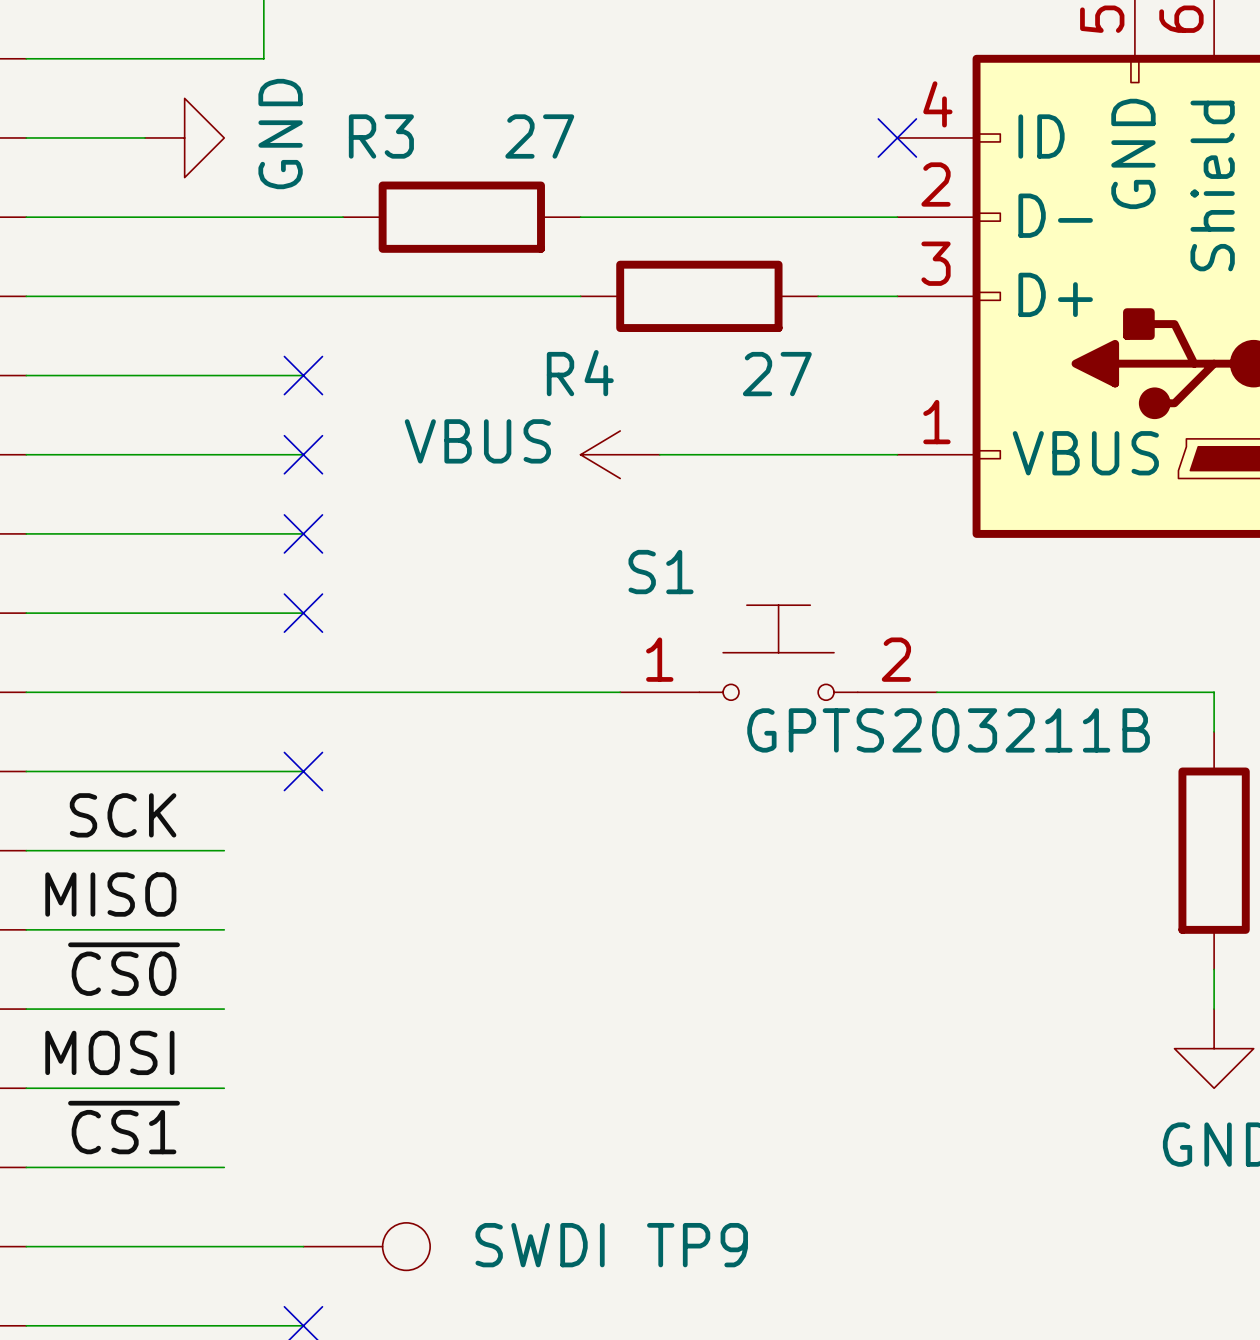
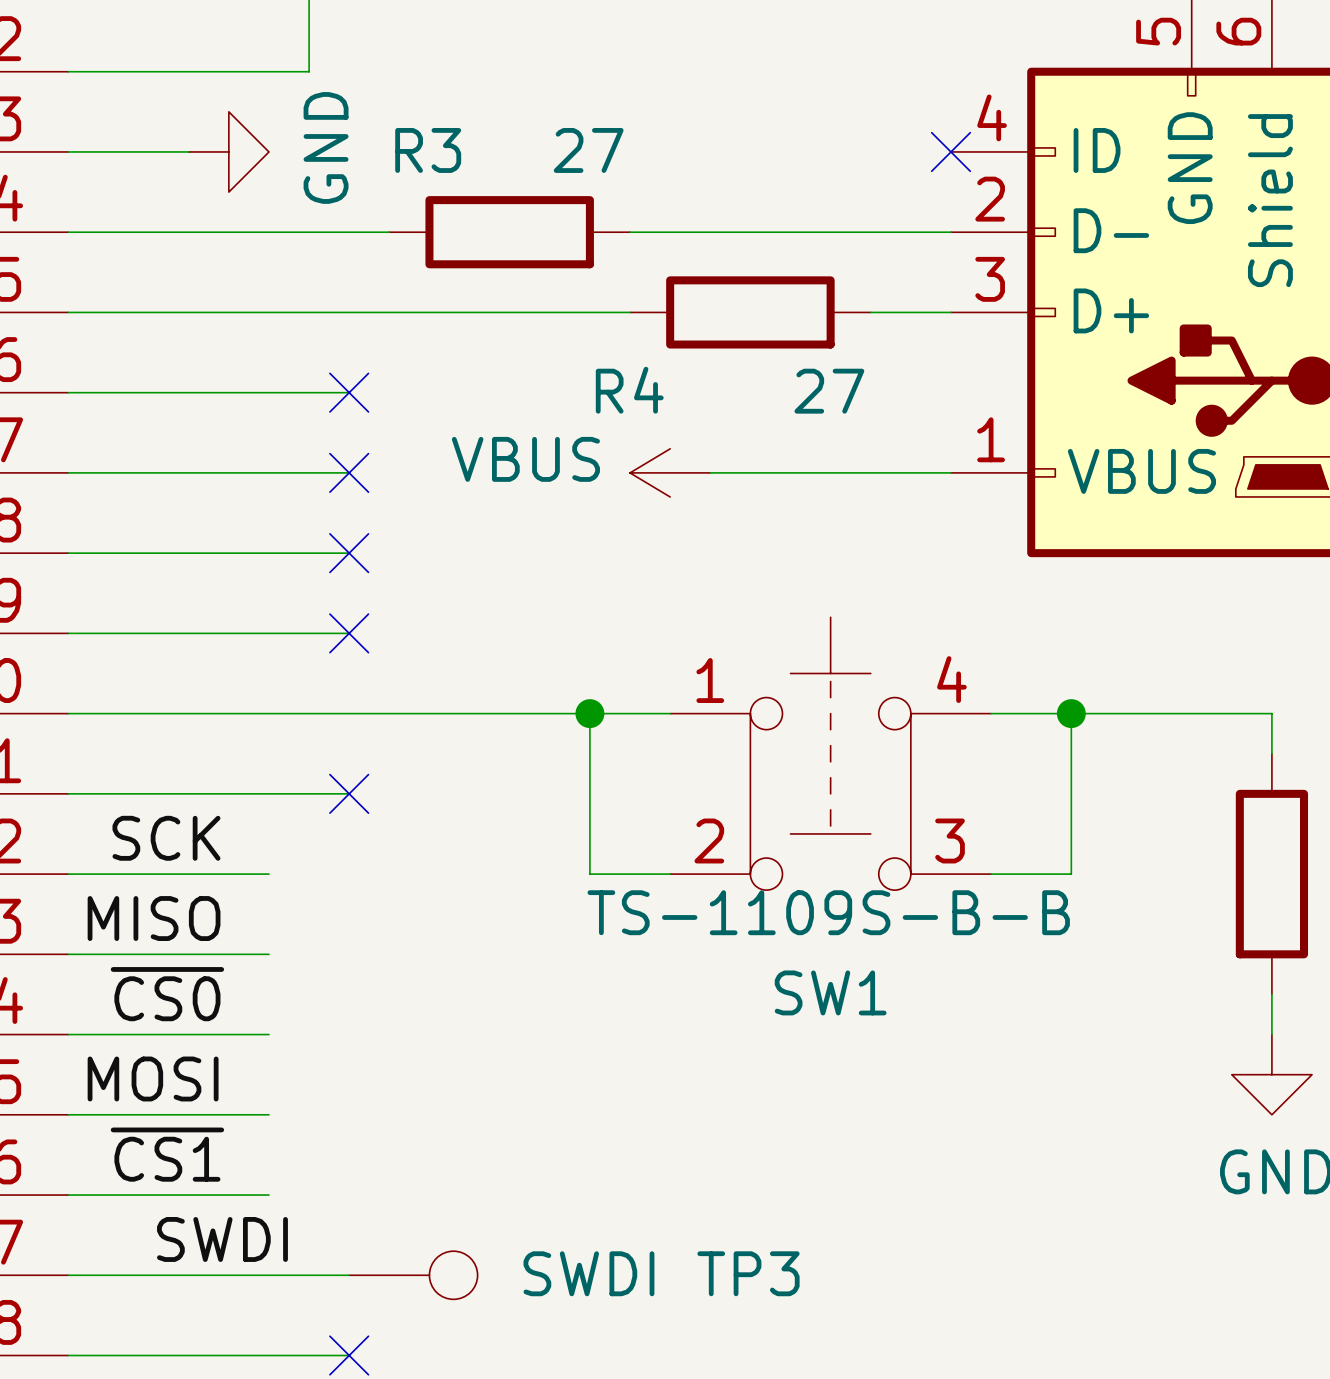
S1: GPTS203211B (778, 652) -> none
wire: none -> (589, 713) (589, 874) (670, 874)
junction: none -> (589, 713)
wire: none -> (1071, 713) (1071, 874) (991, 874)
junction: none -> (1071, 713)
SW1: none -> TS-1109S-B-B (830, 753)
label: none -> SWDI (222, 1239)
TP9 name: TP9 (697, 1245) -> TP3 (748, 1273)

